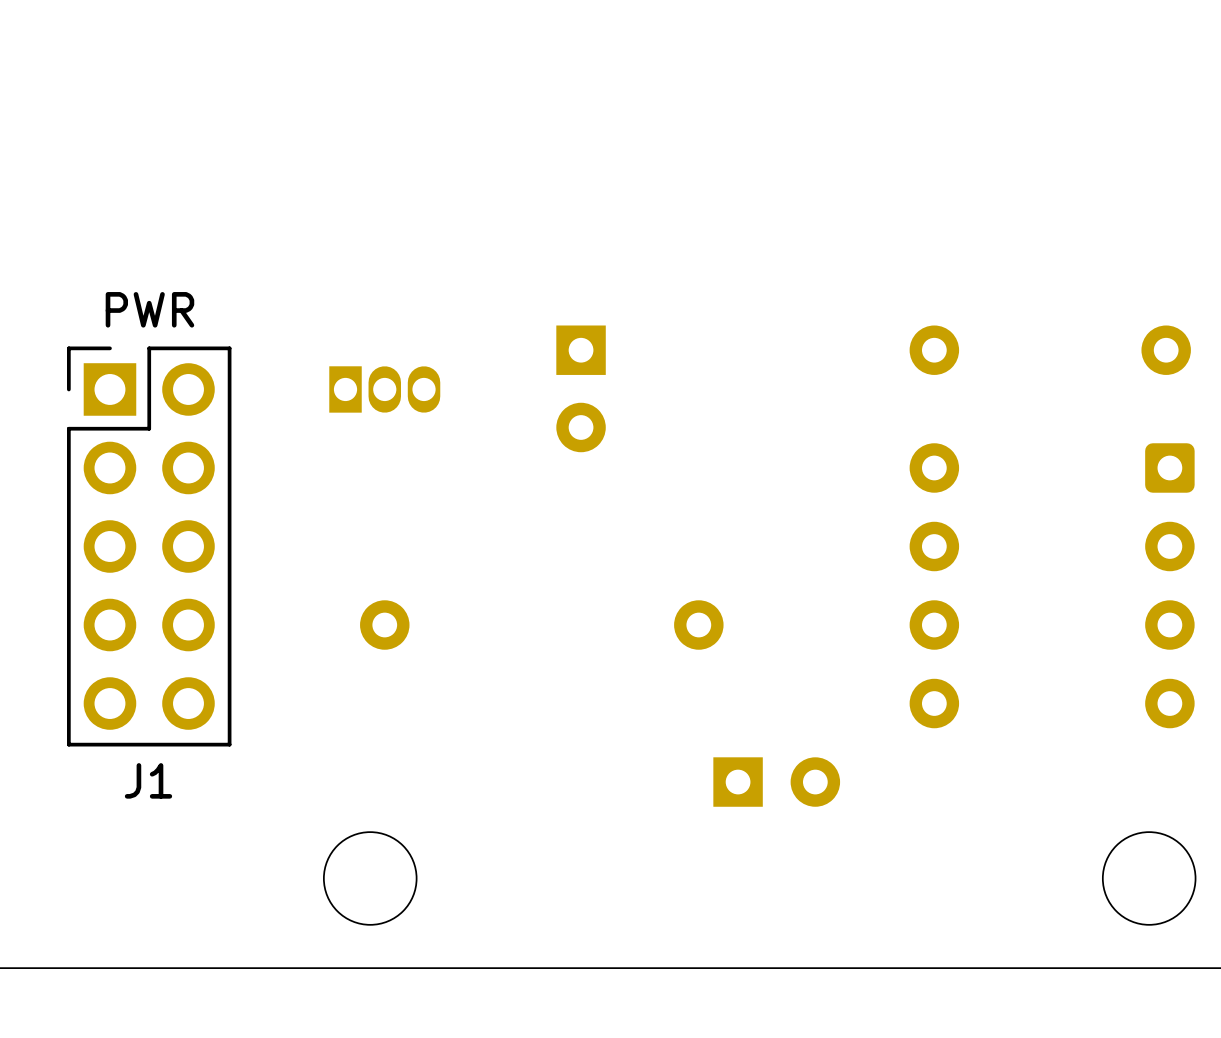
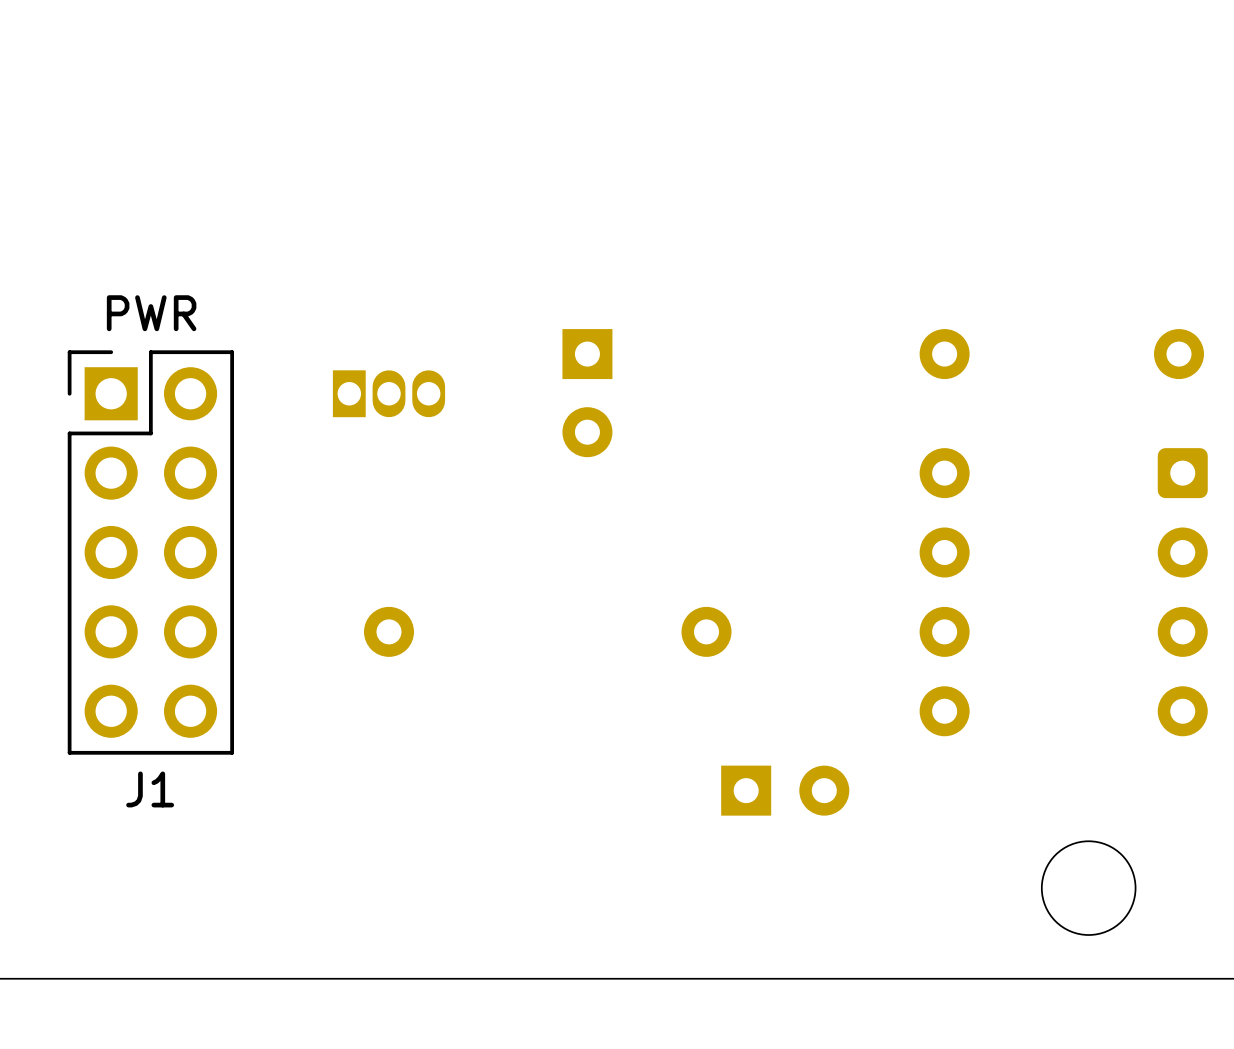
round board edge: [323, 831, 418, 926] -> none
round board edge position: (1149, 878) -> (1088, 888)

